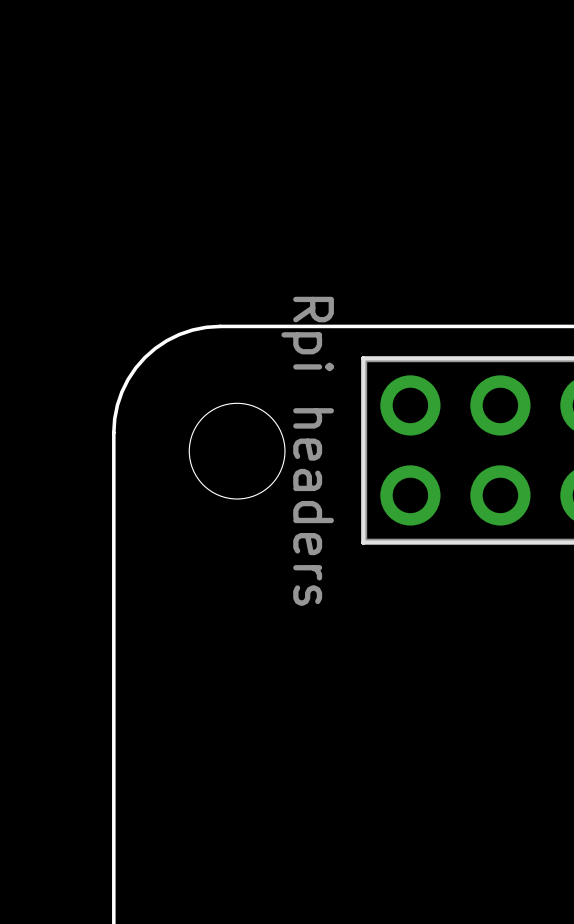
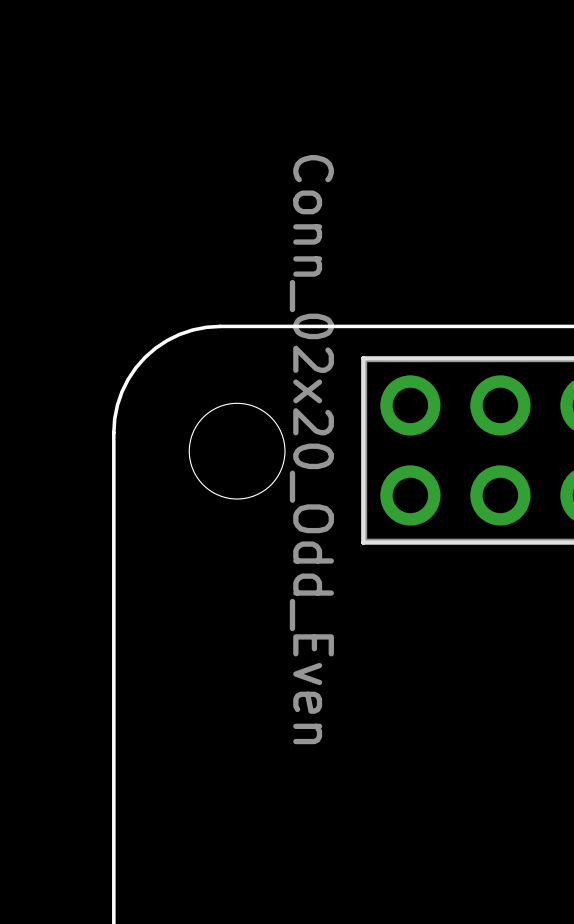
part value: Rpi headers (307, 451) -> Conn_02x20_Odd_Even (311, 449)

